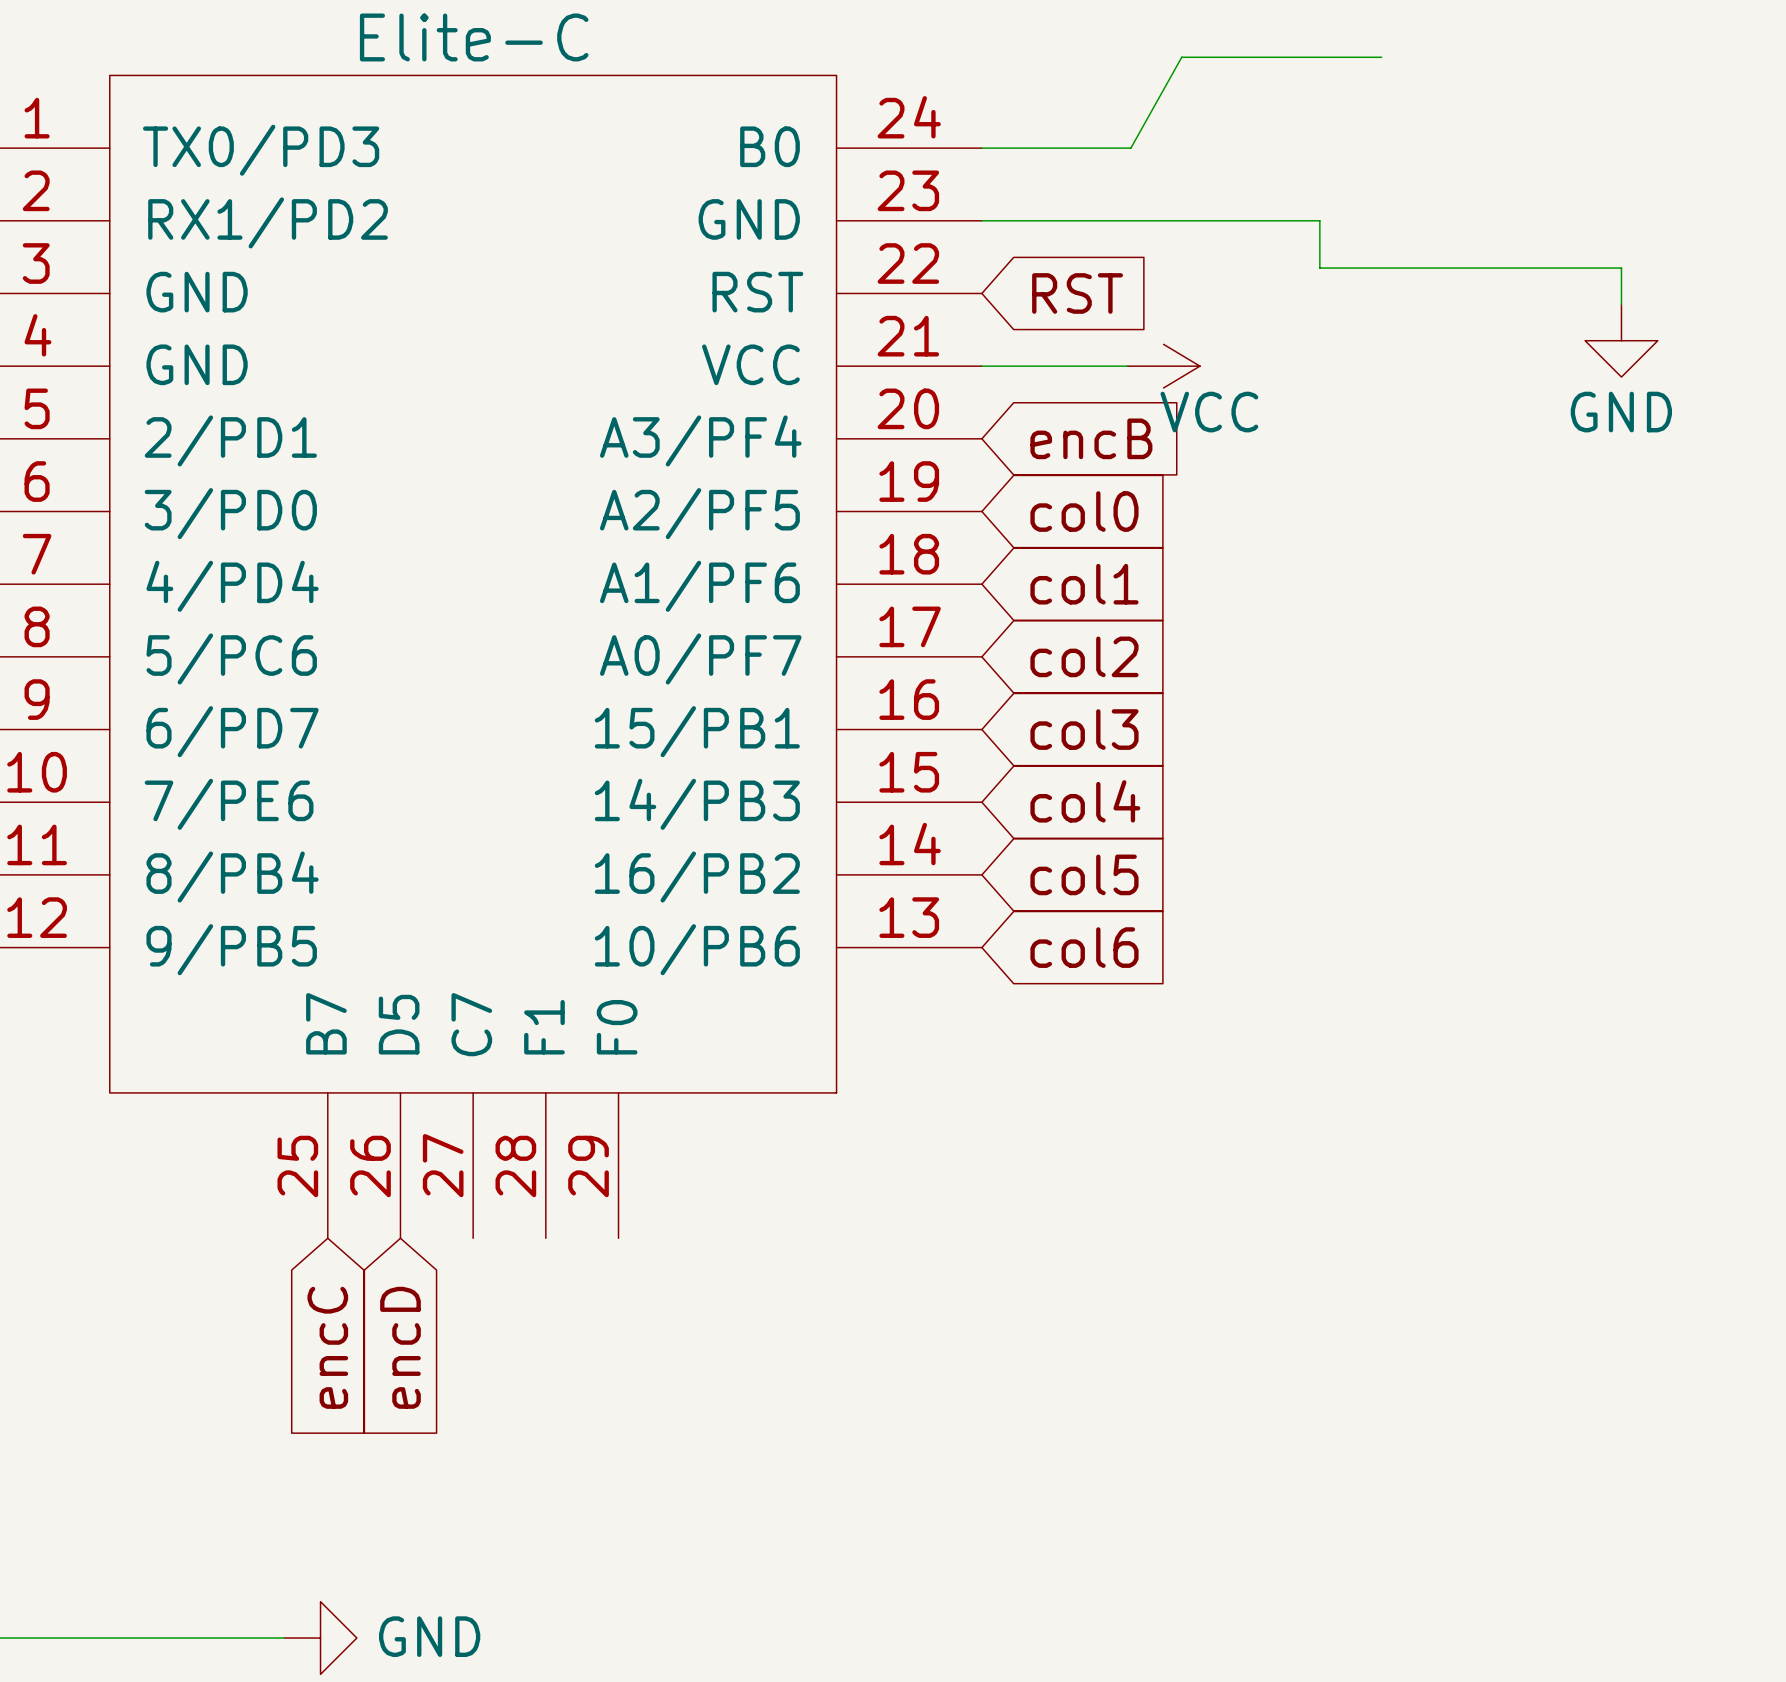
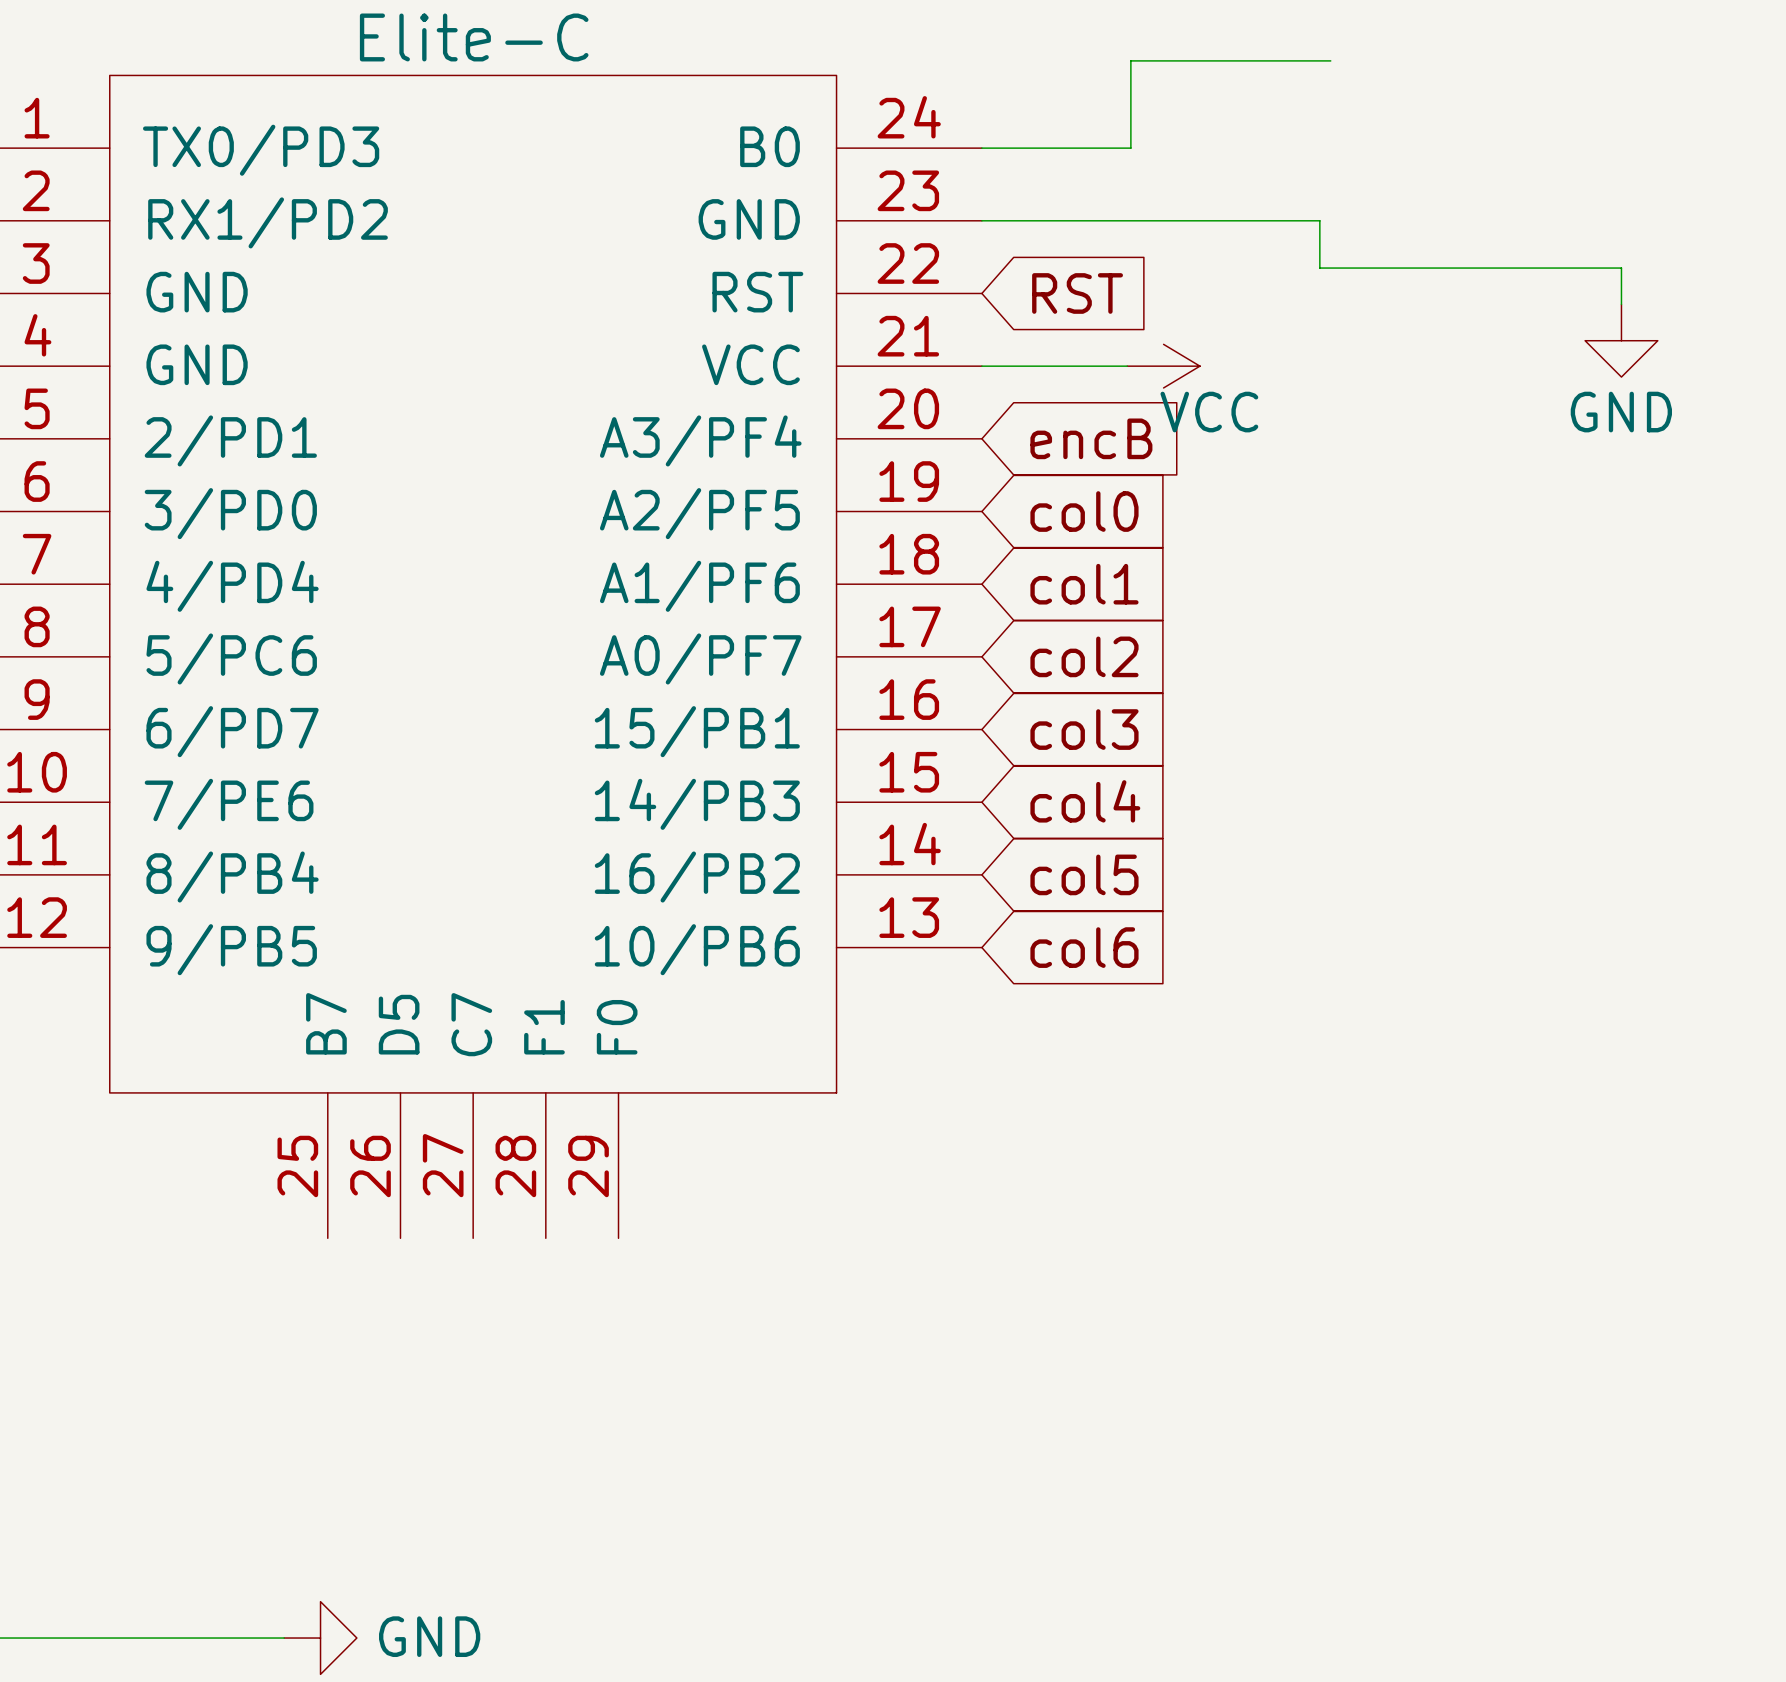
wire: (1381, 57) (1181, 57) (1130, 148) -> (1330, 60) (1130, 60) (1130, 148)
global label: encC (327, 1347) -> none
global label: encD (400, 1347) -> none

